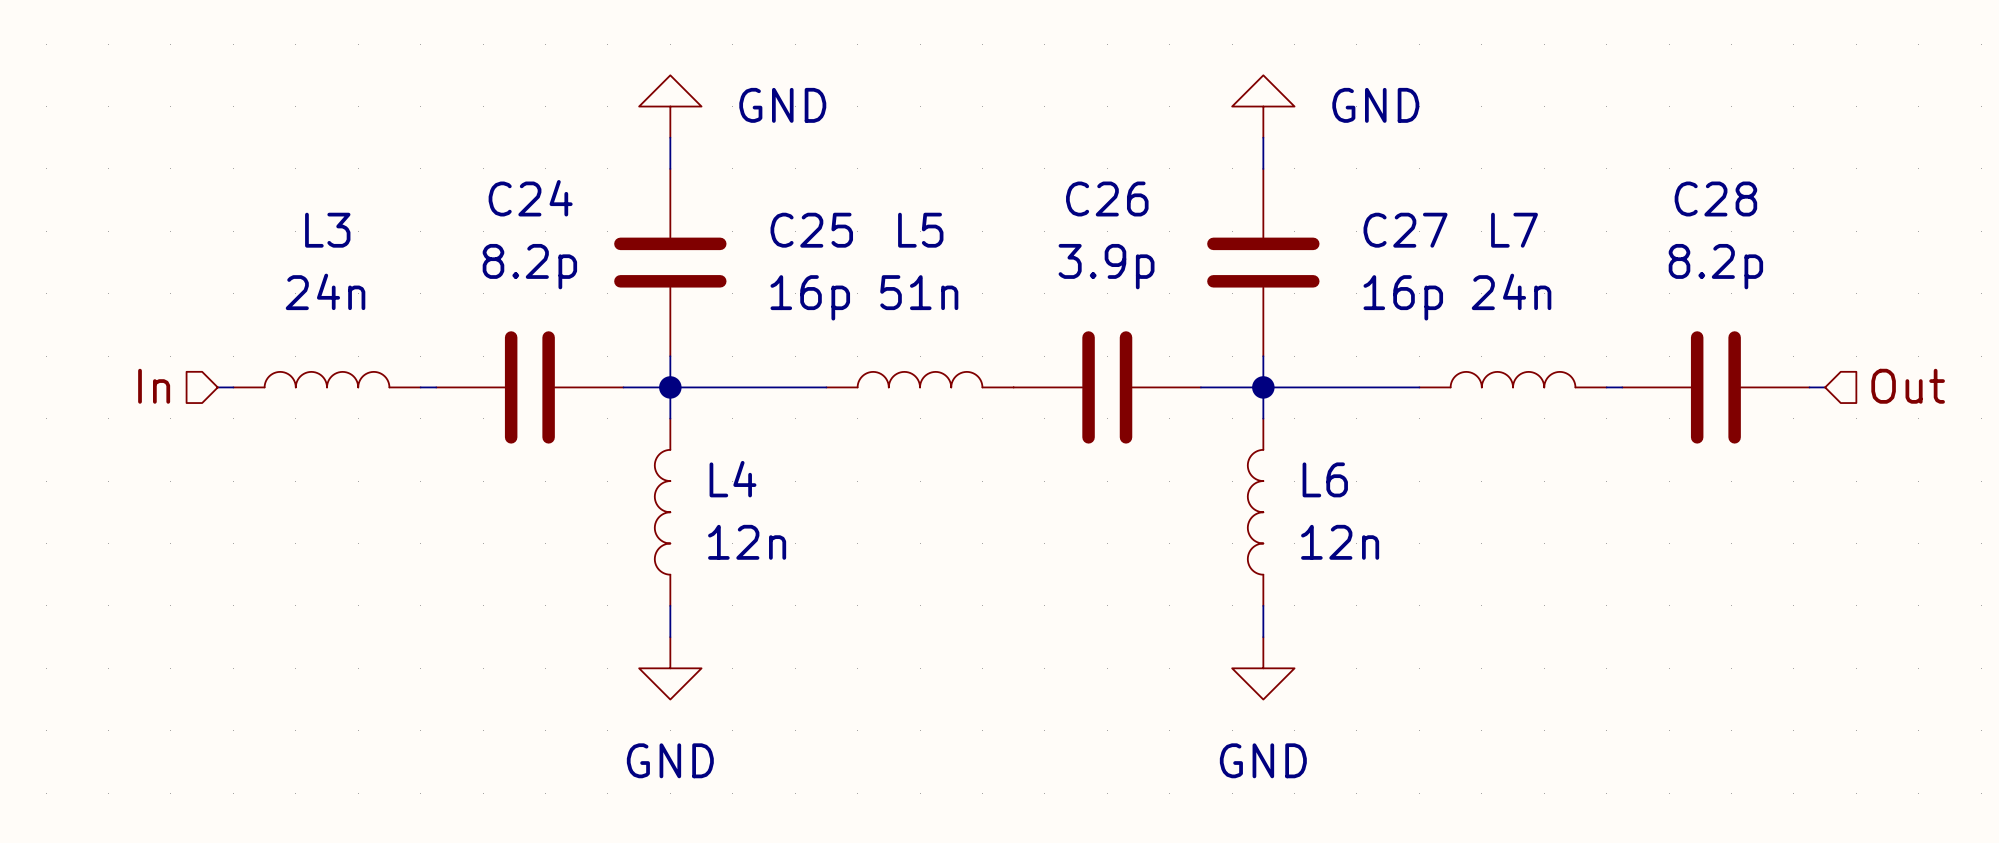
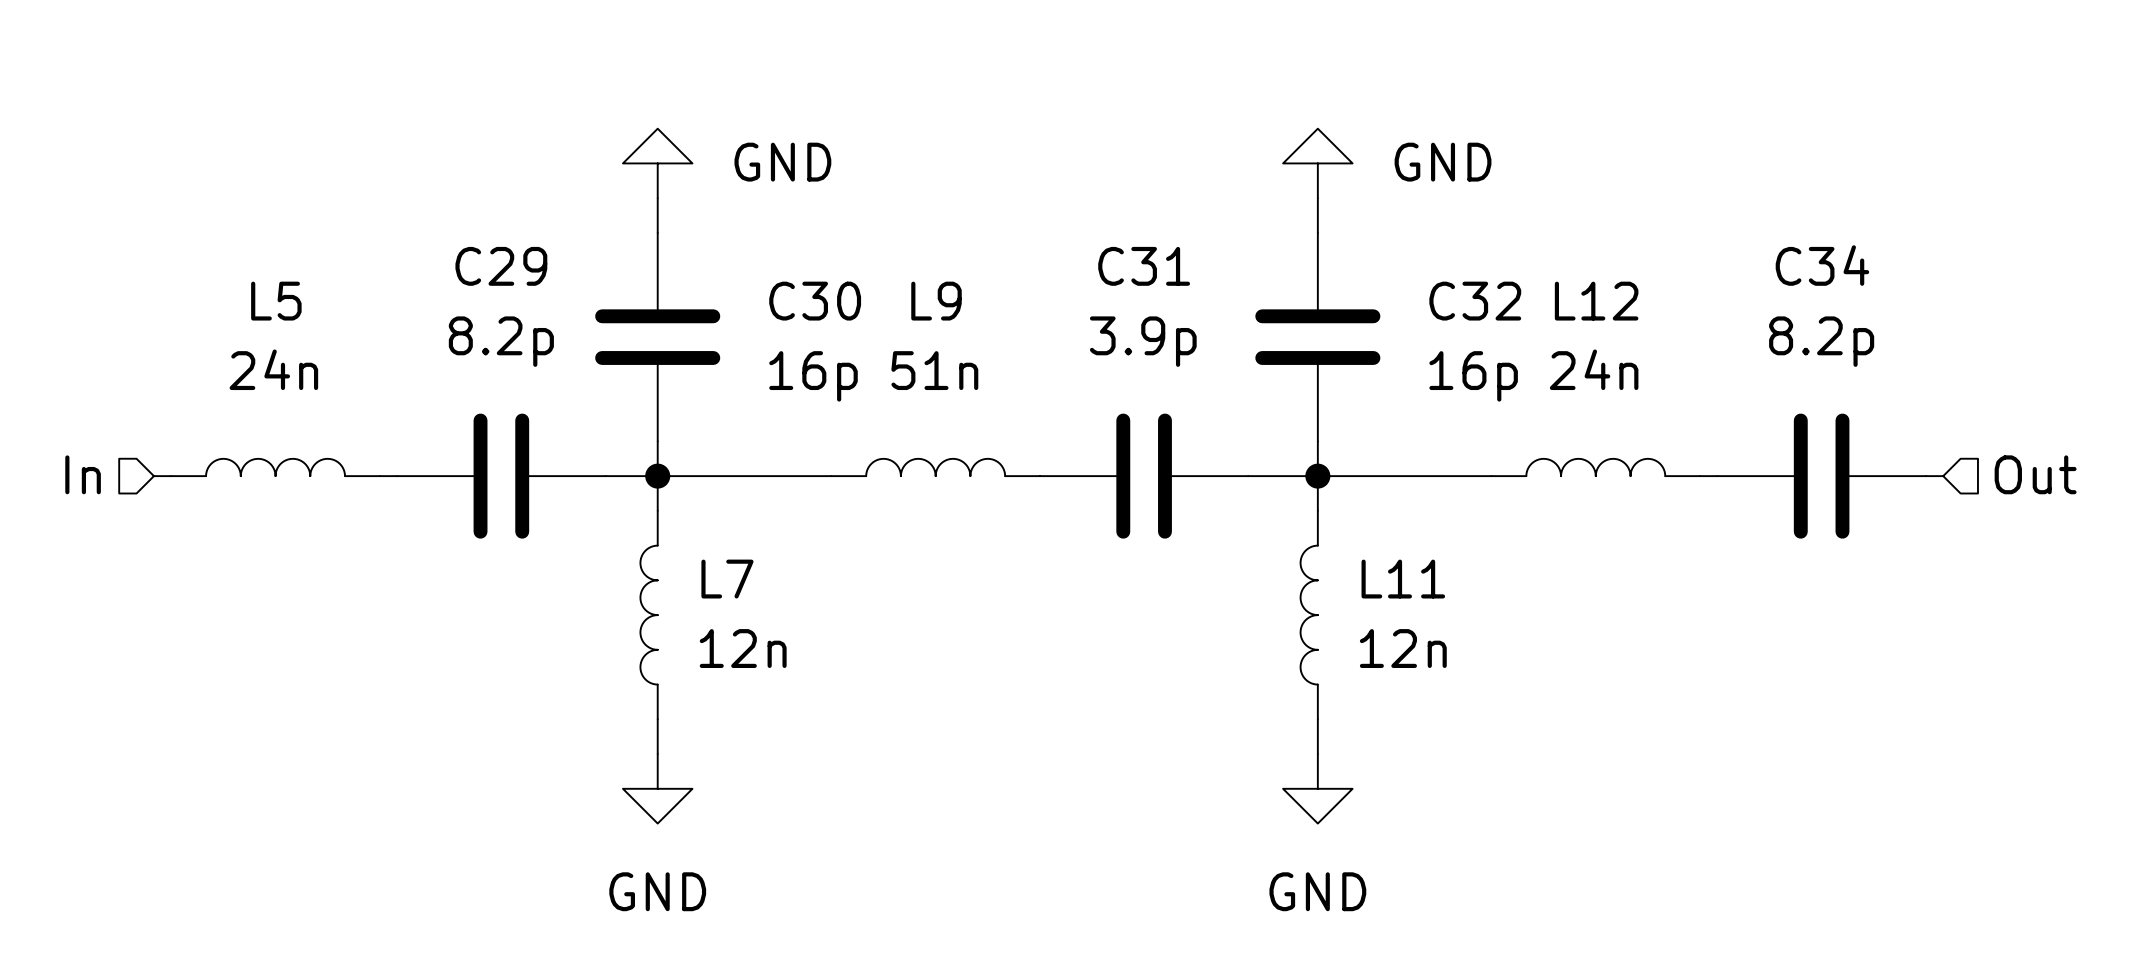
C24 name: C24 (530, 198) -> C29 (501, 266)
C26 name: C26 (1107, 198) -> C31 (1144, 266)
C28 name: C28 (1715, 198) -> C34 (1822, 265)
L3 name: L3 (327, 230) -> L5 (276, 301)
C25 name: C25 (811, 230) -> C30 (815, 301)
L5 name: L5 (920, 230) -> L9 (936, 301)
C27 name: C27 (1405, 230) -> C32 (1475, 301)
L7 name: L7 (1514, 230) -> L12 (1596, 301)
L4 name: L4 (732, 479) -> L7 (727, 579)
L6 name: L6 (1325, 479) -> L11 (1403, 579)

